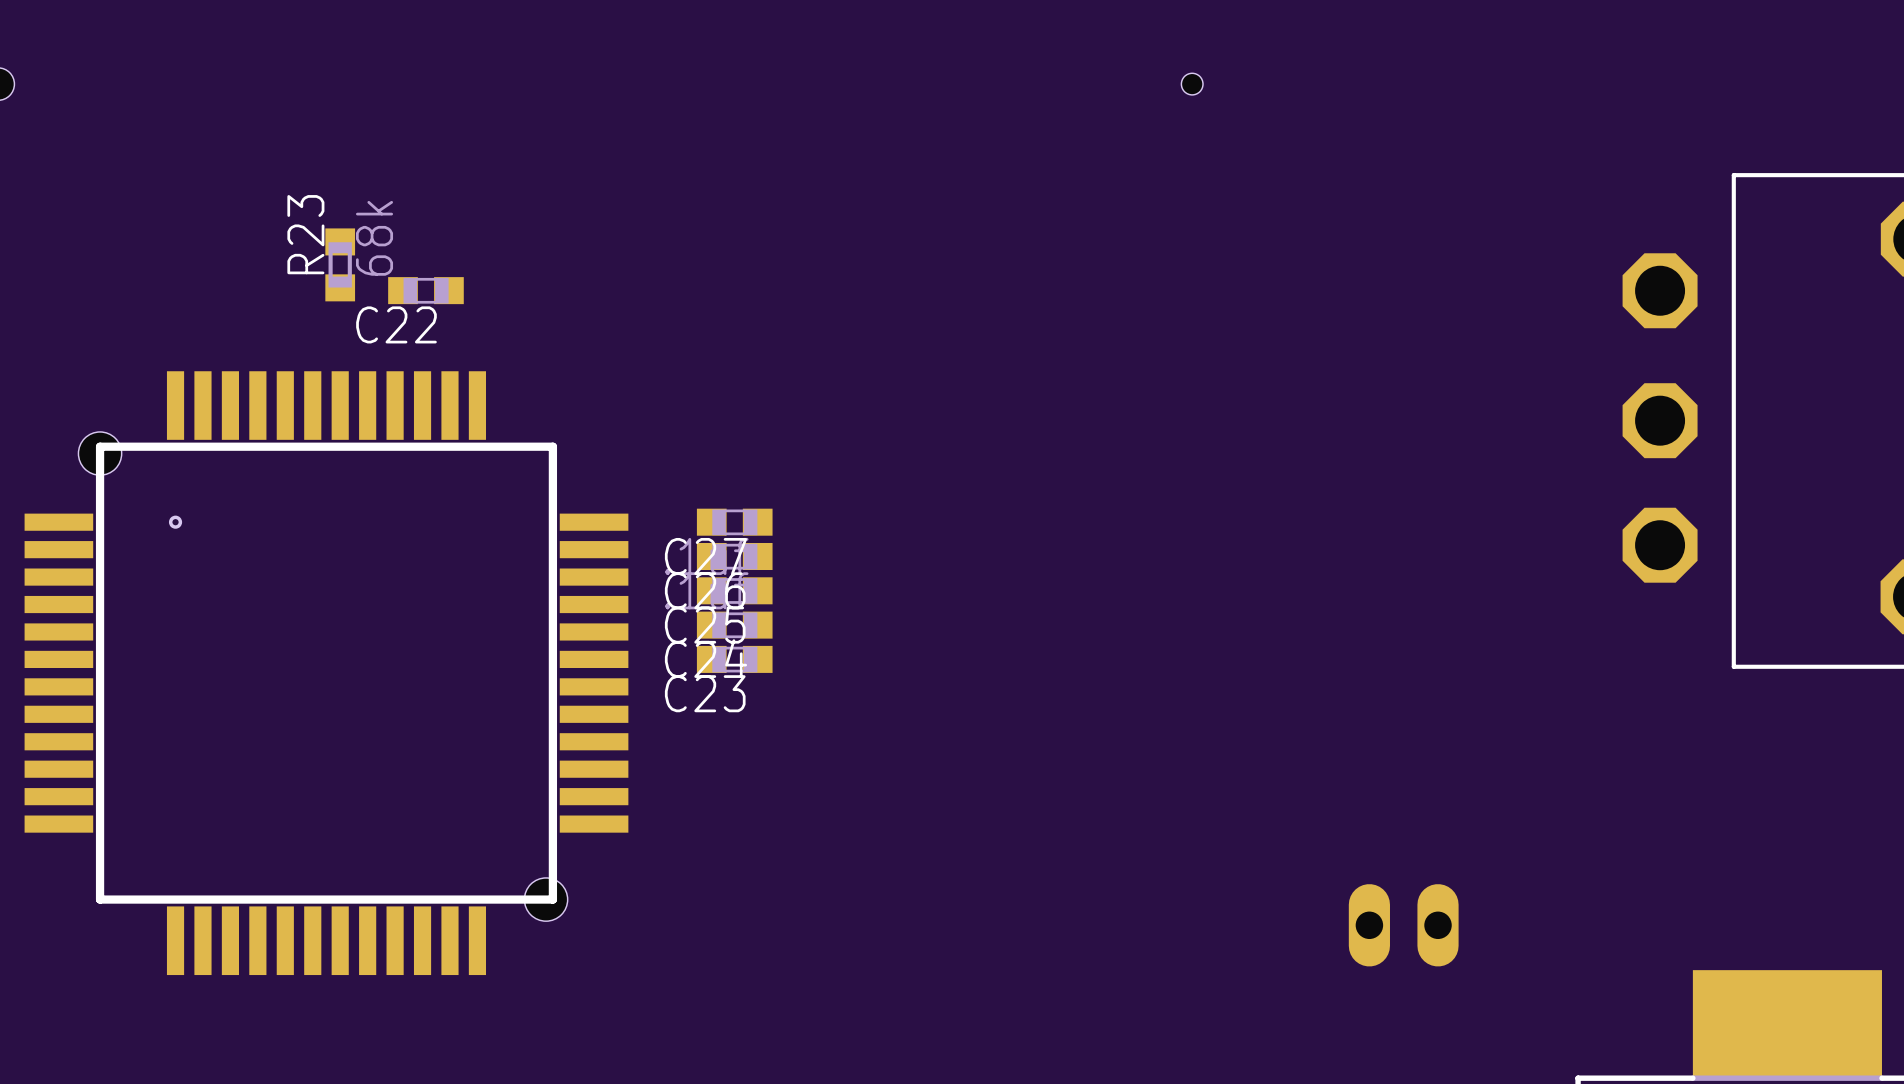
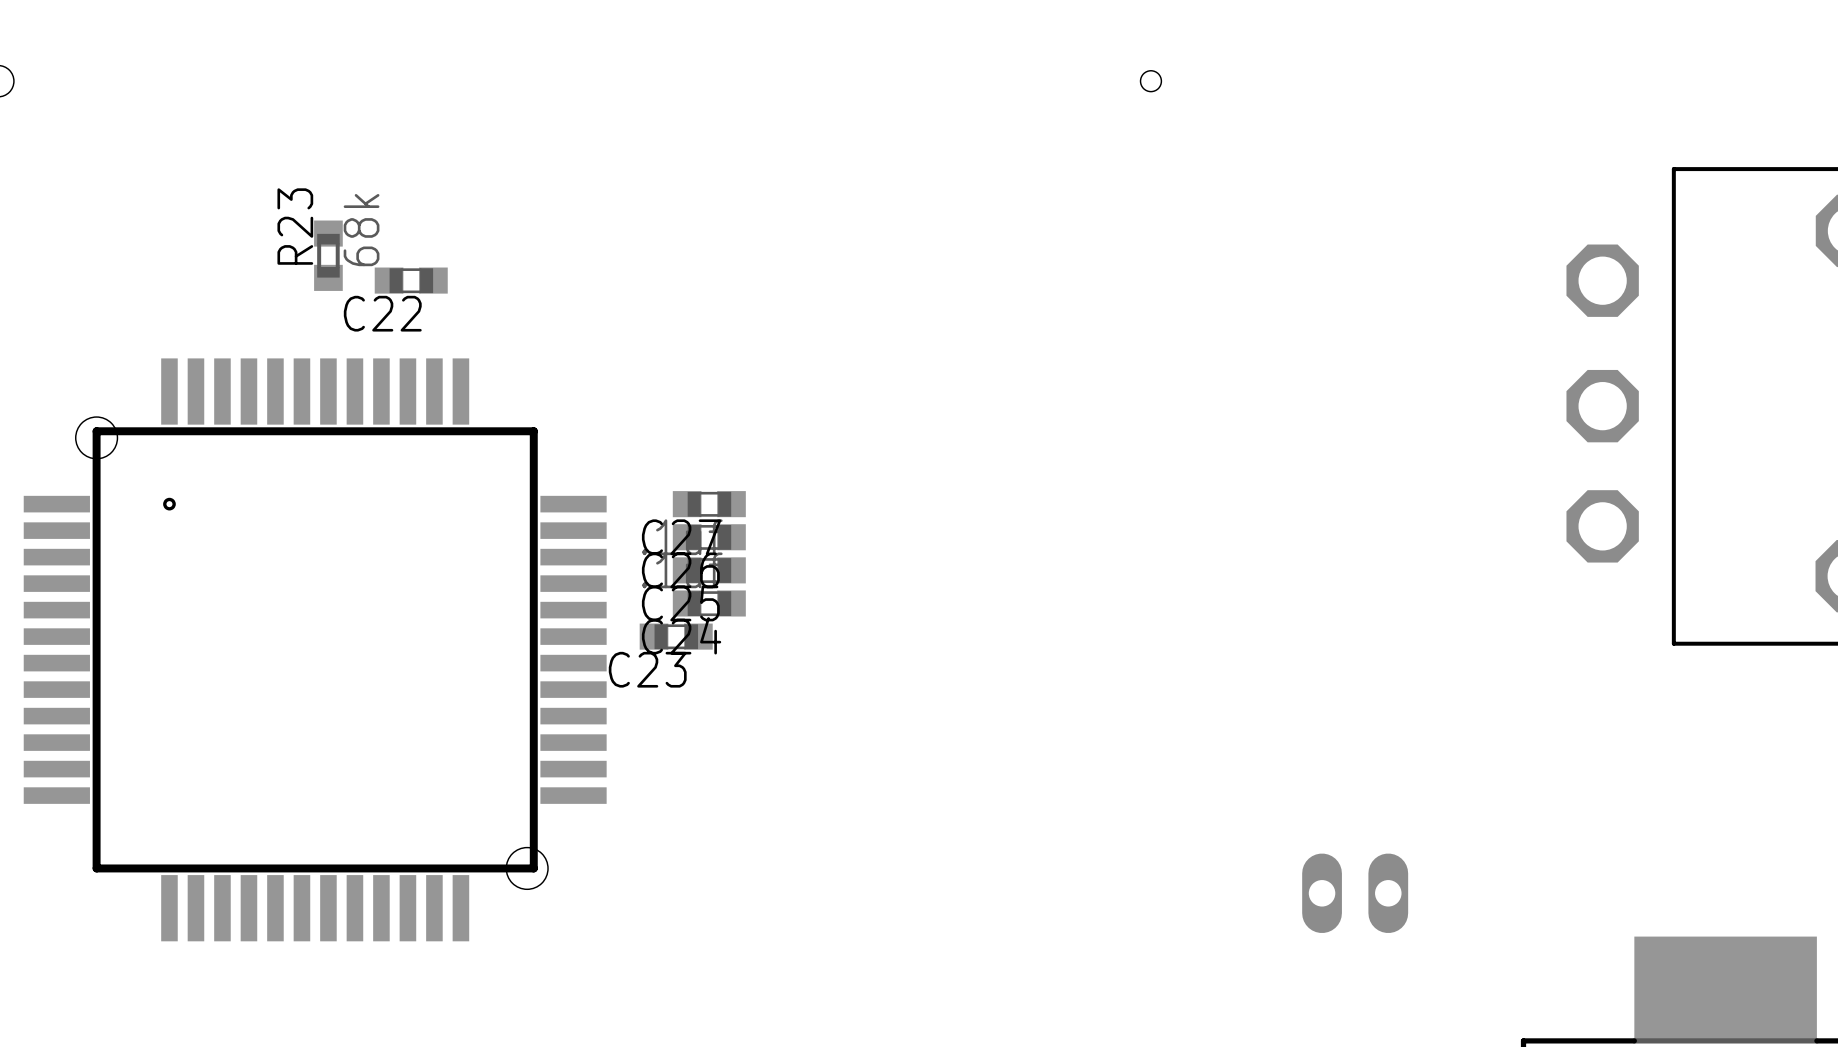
C23 position: (734, 659) -> (676, 636)

